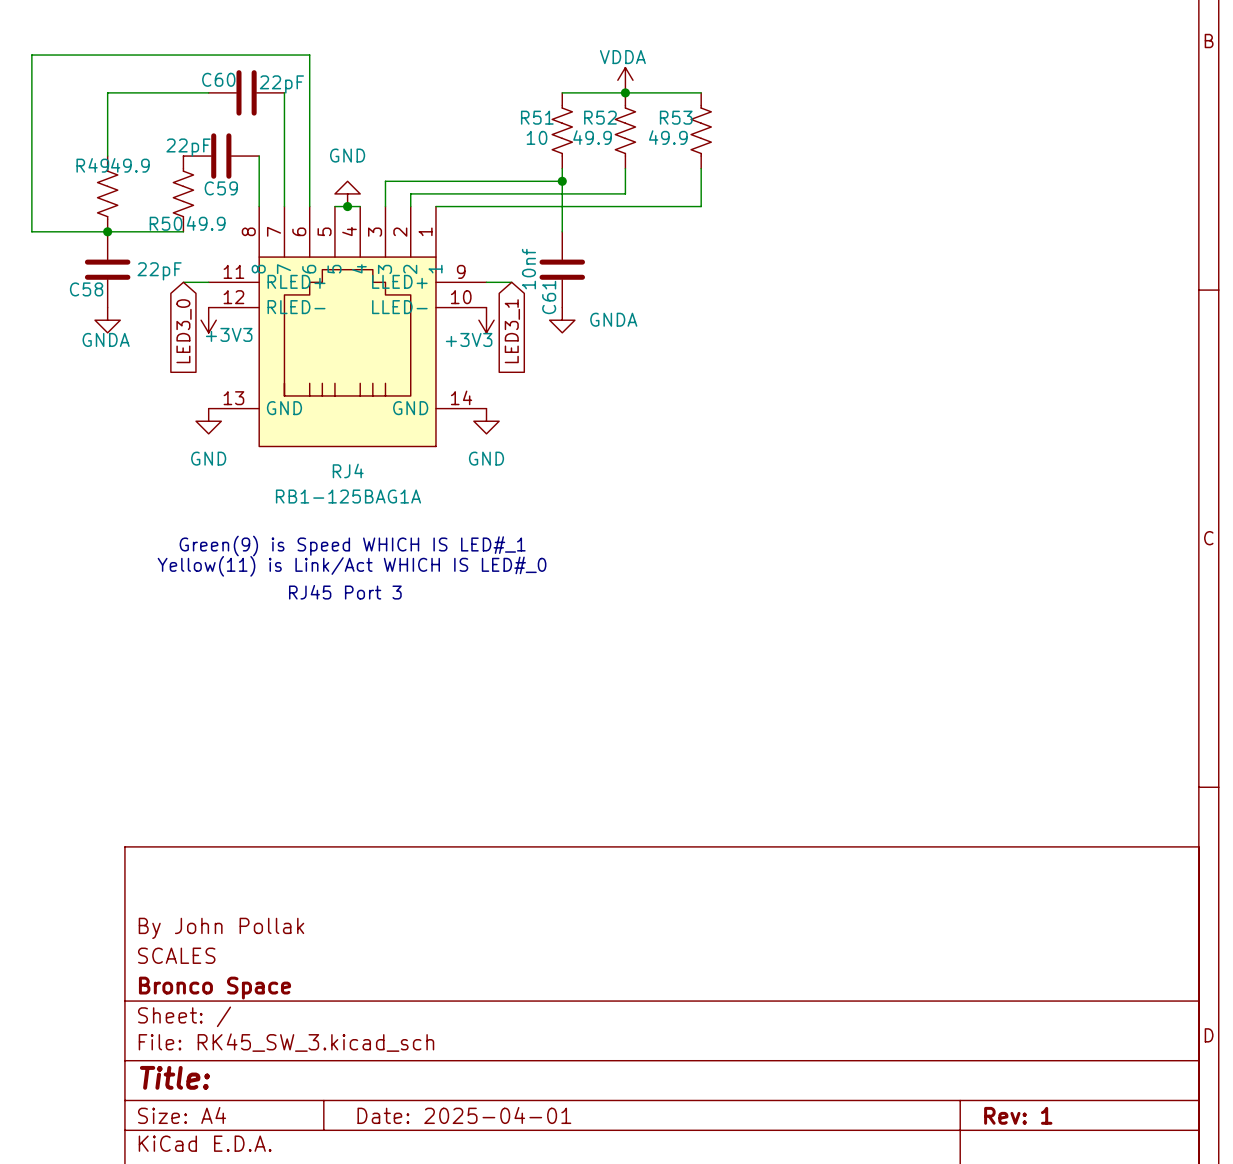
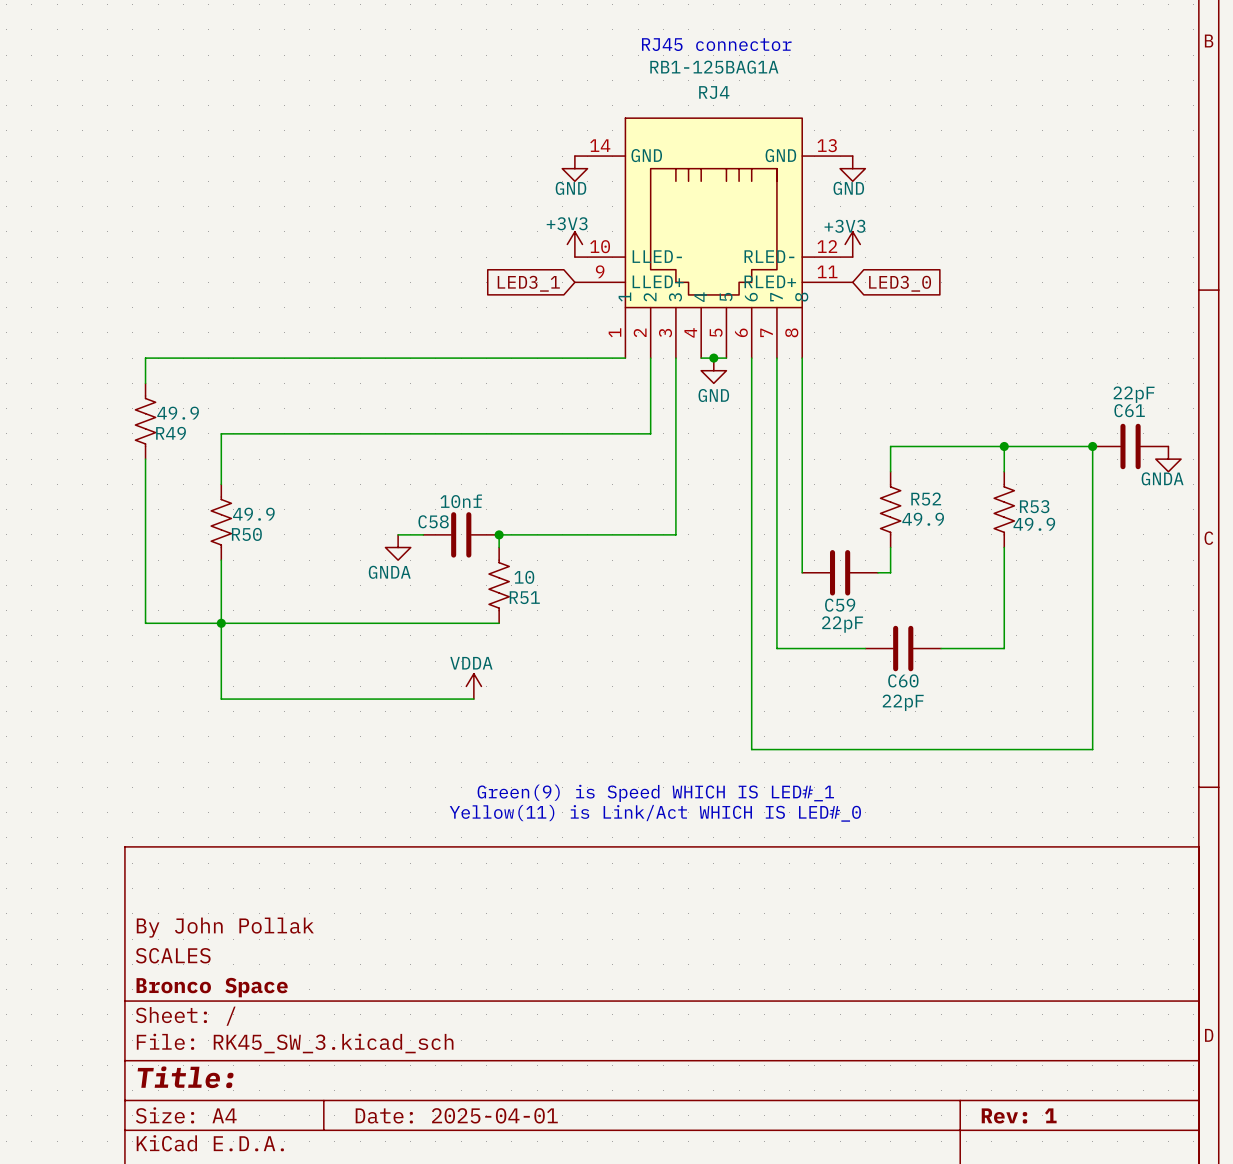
text: none -> RJ45 connector (716, 44)
C60 name position: C60 (218, 79) -> C60 (903, 680)
power symbol: VDDA (625, 80) -> none
C60 value position: 22pF (281, 84) -> 22pF (903, 702)
wire: (208, 92) (107, 92) (107, 156) -> none
C60 position: (246, 92) -> (903, 648)
wire: (284, 92) (284, 206) -> none
wire: (562, 92) (701, 92) -> none
junction: (625, 92) -> none
R51 name position: R51 (537, 117) -> R51 (524, 597)
R52 name position: R52 (600, 117) -> R52 (926, 499)
R53 name position: R53 (676, 117) -> R53 (1034, 506)
R51 position: (562, 130) -> (499, 585)
R52 position: (625, 130) -> (890, 509)
R53 position: (701, 130) -> (1004, 509)
R51 value position: 10 (537, 137) -> 10 (524, 577)
R52 value position: 49.9 (592, 137) -> 49.9 (923, 519)
R53 value position: 49.9 (668, 137) -> 49.9 (1034, 524)
C59 value position: 22pF (188, 147) -> 22pF (842, 624)
C59 position: (221, 156) -> (840, 572)
wire: (259, 156) (259, 206) -> none
R49 name position: R49 (92, 165) -> R49 (171, 433)
R49 value position: 49.9 (130, 165) -> 49.9 (178, 413)
wire: (562, 168) (562, 231) -> none
power symbol: none -> GND (574, 168)
wire: (625, 168) (625, 193) (410, 193) (410, 206) -> none
wire: (701, 168) (701, 206) (435, 206) -> none
power symbol: none -> GND (852, 168)
wire: (562, 181) (385, 181) (385, 206) -> none
junction: (562, 181) -> none
R49 position: (107, 193) -> (145, 421)
R50 position: (183, 193) -> (221, 522)
power symbol: GND (347, 193) -> none
wire: (309, 206) (309, 55) (31, 55) (31, 231) (183, 231) -> none
wire: (334, 206) (360, 206) -> none
junction: (347, 206) -> none
R50 name position: R50 (166, 223) -> R50 (246, 534)
R50 value position: 49.9 (206, 223) -> 49.9 (253, 514)
junction: (107, 231) -> none
power symbol: none -> +3V3 (852, 244)
C58 rotation: 0° (107, 269) -> 90° clockwise (461, 534)
C58 position: (107, 269) -> (461, 534)
C61 value: 10nf (528, 269) -> 22pF (1134, 394)
C61 rotation: 0° (562, 269) -> 90° clockwise (1130, 446)
C61 position: (562, 269) -> (1130, 446)
C58 value: 22pF (159, 271) -> 10nf (461, 501)
wire: (183, 282) (208, 282) -> none
wire: (486, 282) (511, 282) -> (701, 358) (726, 358)
global label: none -> LED3_0 (900, 283)
C61 name position: C61 (549, 297) -> C61 (1129, 410)
power symbol: GNDA (107, 320) -> none
power symbol: +3V3 (208, 320) -> none
power symbol rotation: 0° (486, 320) -> 180° (574, 244)
power symbol position: +3V3 (486, 320) -> +3V3 (574, 244)
power symbol: GNDA (562, 320) -> none
RJ4 position: (347, 326) -> (713, 238)
global label: LED3_0 (184, 331) -> none
global label rotation: 0° (512, 331) -> 90° clockwise (528, 283)
power symbol text position: +3V3 (469, 339) -> +3V3 (567, 223)
RJ4 rotation: 0° (347, 351) -> 180° (713, 212)
wire: none -> (625, 358) (145, 358) (145, 383)
wire: none -> (650, 358) (650, 433) (221, 433) (221, 484)
wire: none -> (675, 358) (675, 534) (499, 534) (499, 547)
junction: none -> (713, 358)
wire: none -> (751, 358) (751, 749) (1092, 749) (1092, 446) (890, 446) (890, 471)
wire: none -> (776, 358) (776, 648) (865, 648)
wire: none -> (802, 358) (802, 572)
power symbol: none -> GND (713, 370)
power symbol: GND (208, 421) -> none
power symbol: GND (486, 421) -> none
wire: none -> (1004, 446) (1004, 471)
junction: none -> (1004, 446)
junction: none -> (1092, 446)
wire: none -> (145, 459) (145, 623) (499, 623)
power symbol: none -> GNDA (1168, 459)
wire: none -> (398, 534) (423, 534)
junction: none -> (499, 534)
text: Green(9) is Speed WHICH IS LED#_1 (352, 546) -> none
power symbol: none -> GNDA (398, 547)
wire: none -> (890, 547) (890, 572) (877, 572)
wire: none -> (1004, 547) (1004, 648) (941, 648)
wire: none -> (221, 560) (221, 699) (473, 699)
text: Yellow(11) is Link/Act WHICH IS LED#_0 (352, 566) -> none
text: RJ45 Port 3 (345, 592) -> none
junction: none -> (221, 623)
power symbol: none -> VDDA (473, 686)
text: none -> Green(9) is Speed WHICH IS LED#_1 (655, 793)
text: none -> Yellow(11) is Link/Act WHICH IS LED#_0 (655, 813)

